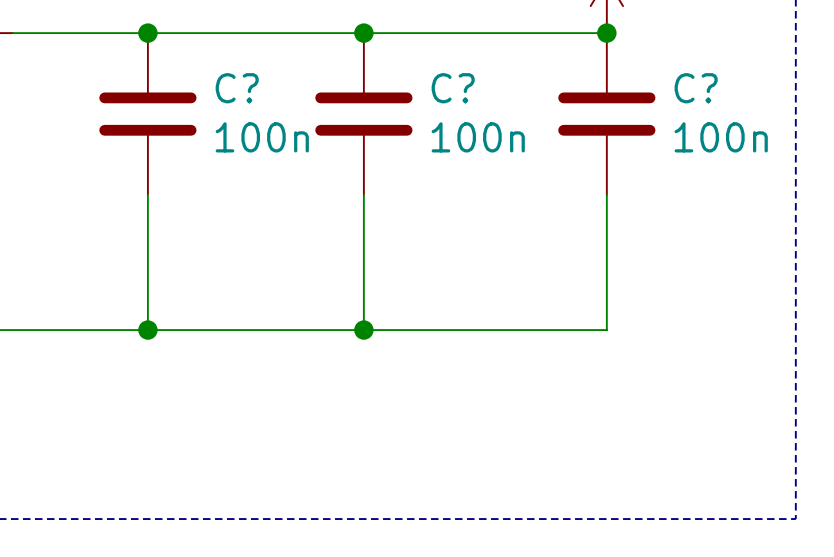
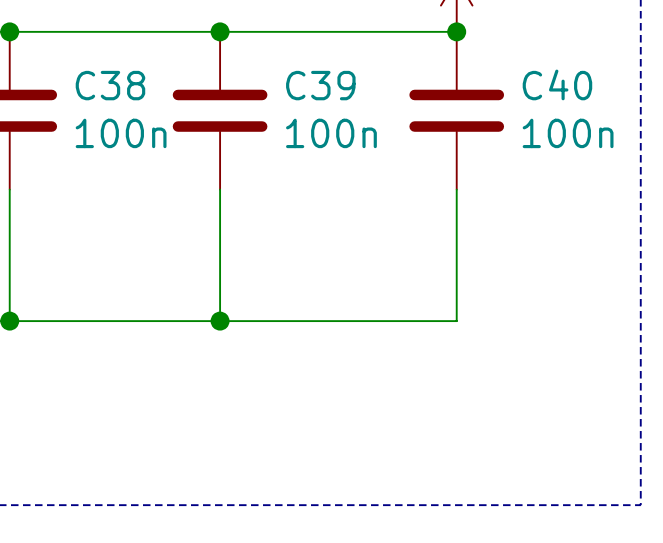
C? name: C? (237, 88) -> C38 (110, 85)
C? name: C? (453, 88) -> C39 (320, 85)
C? name: C? (696, 88) -> C40 (557, 84)

